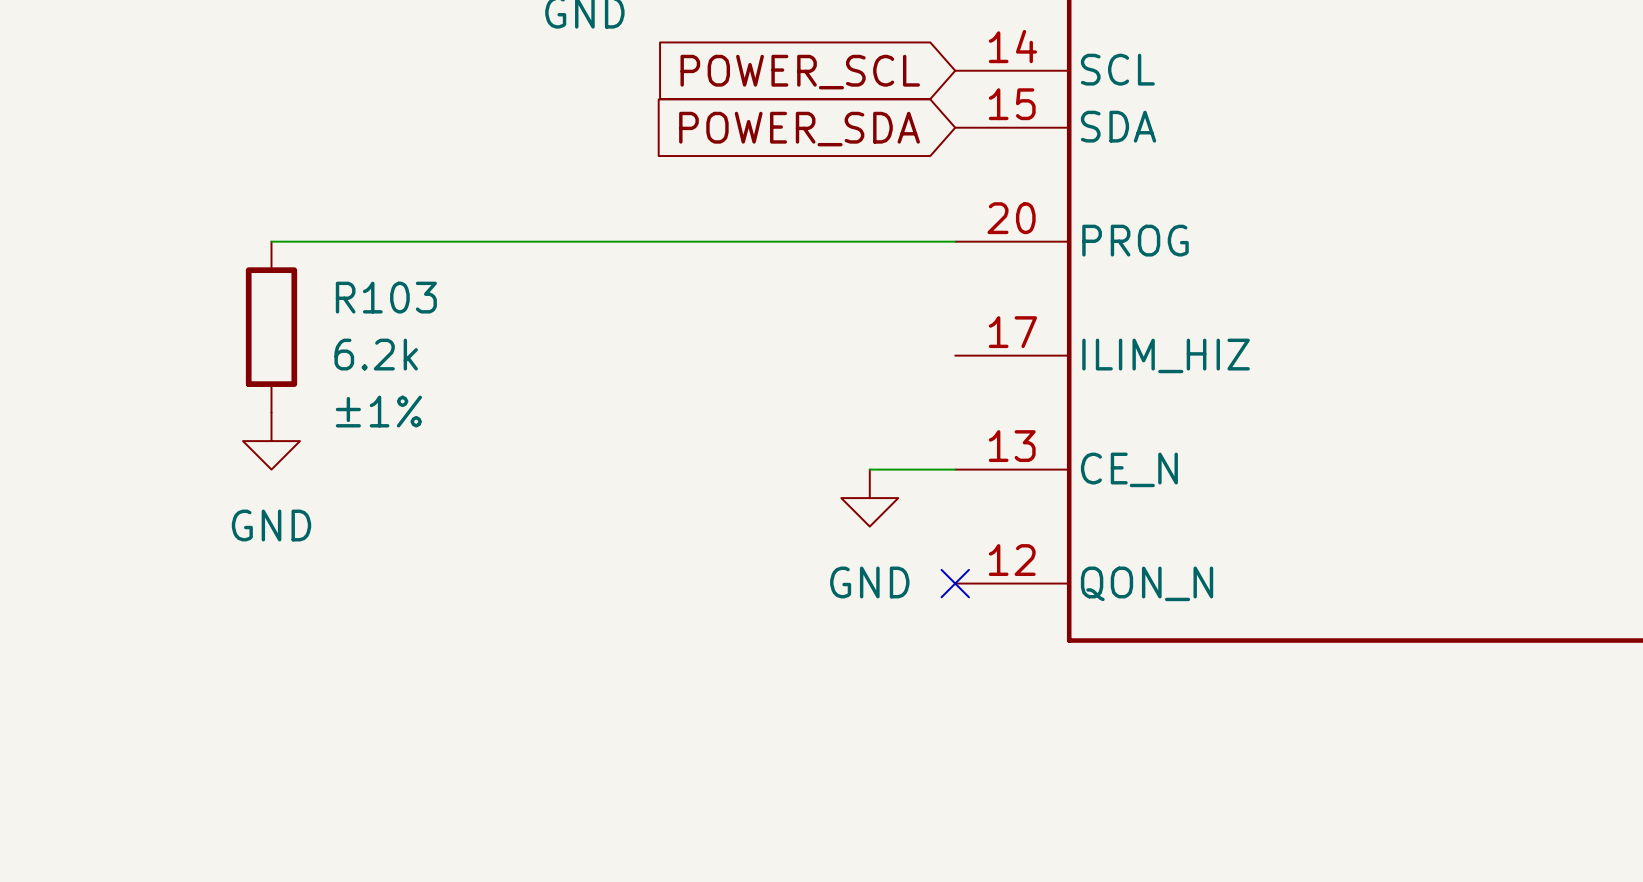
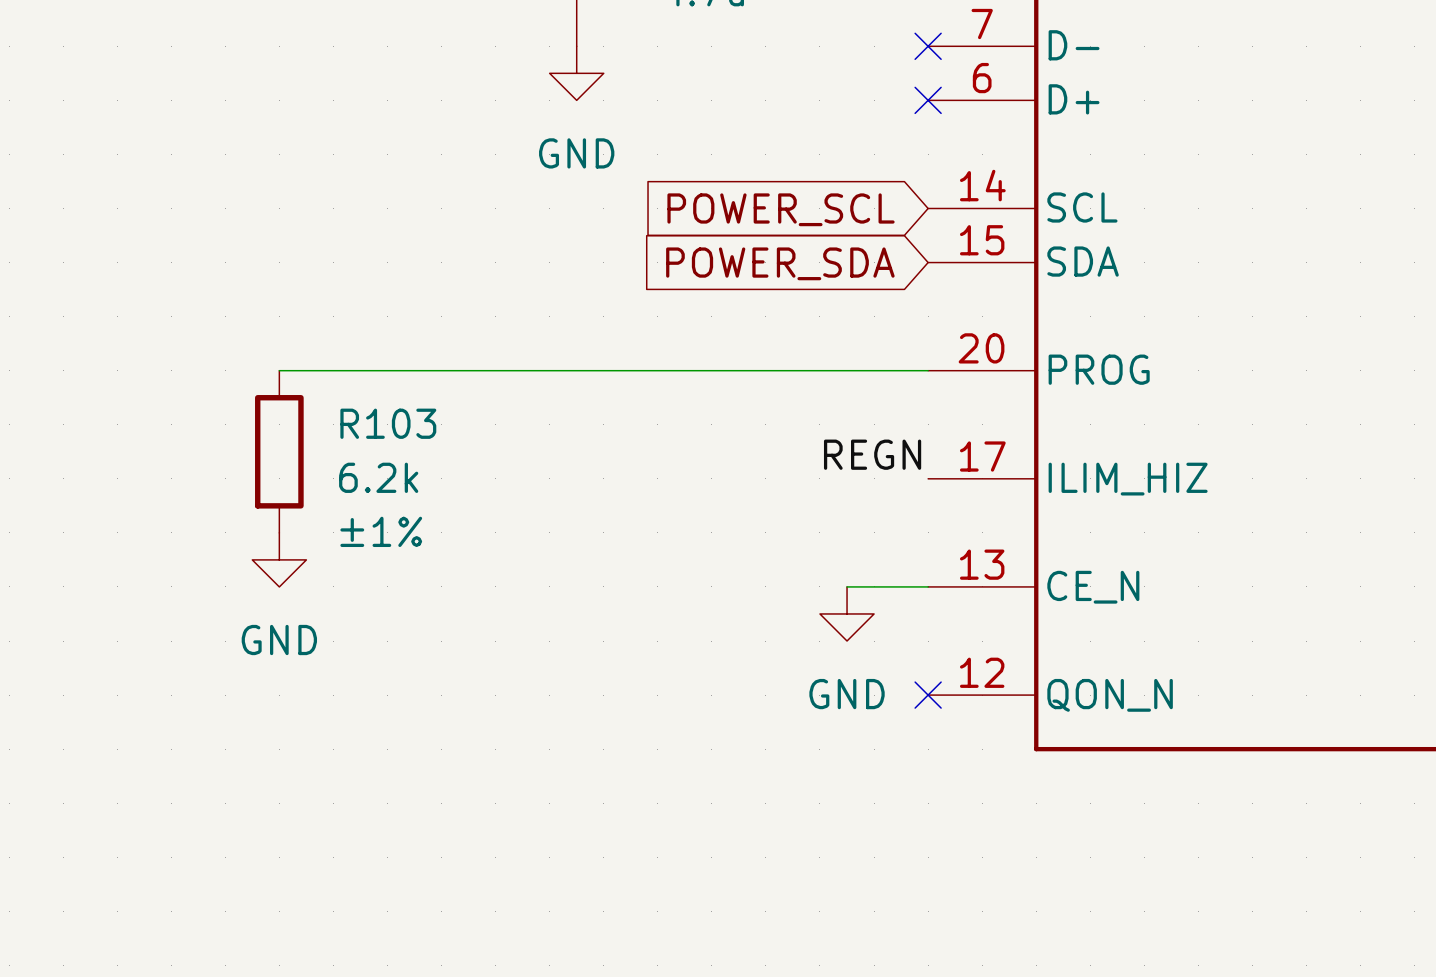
label: none -> REGN (872, 454)

